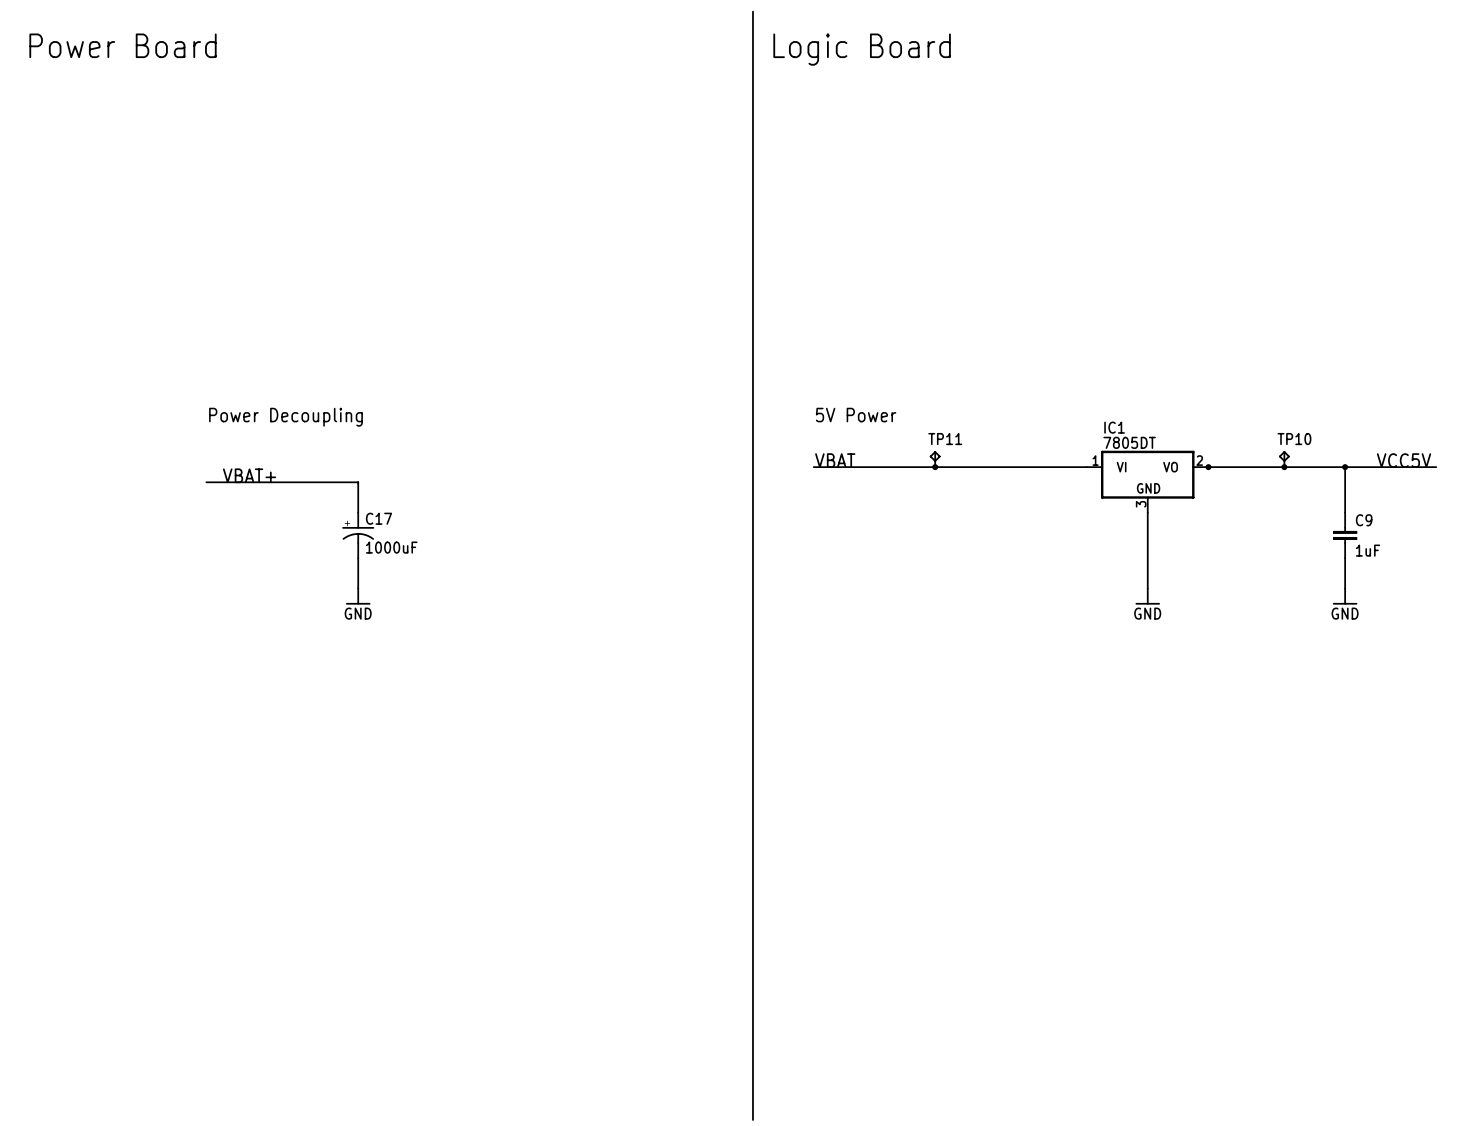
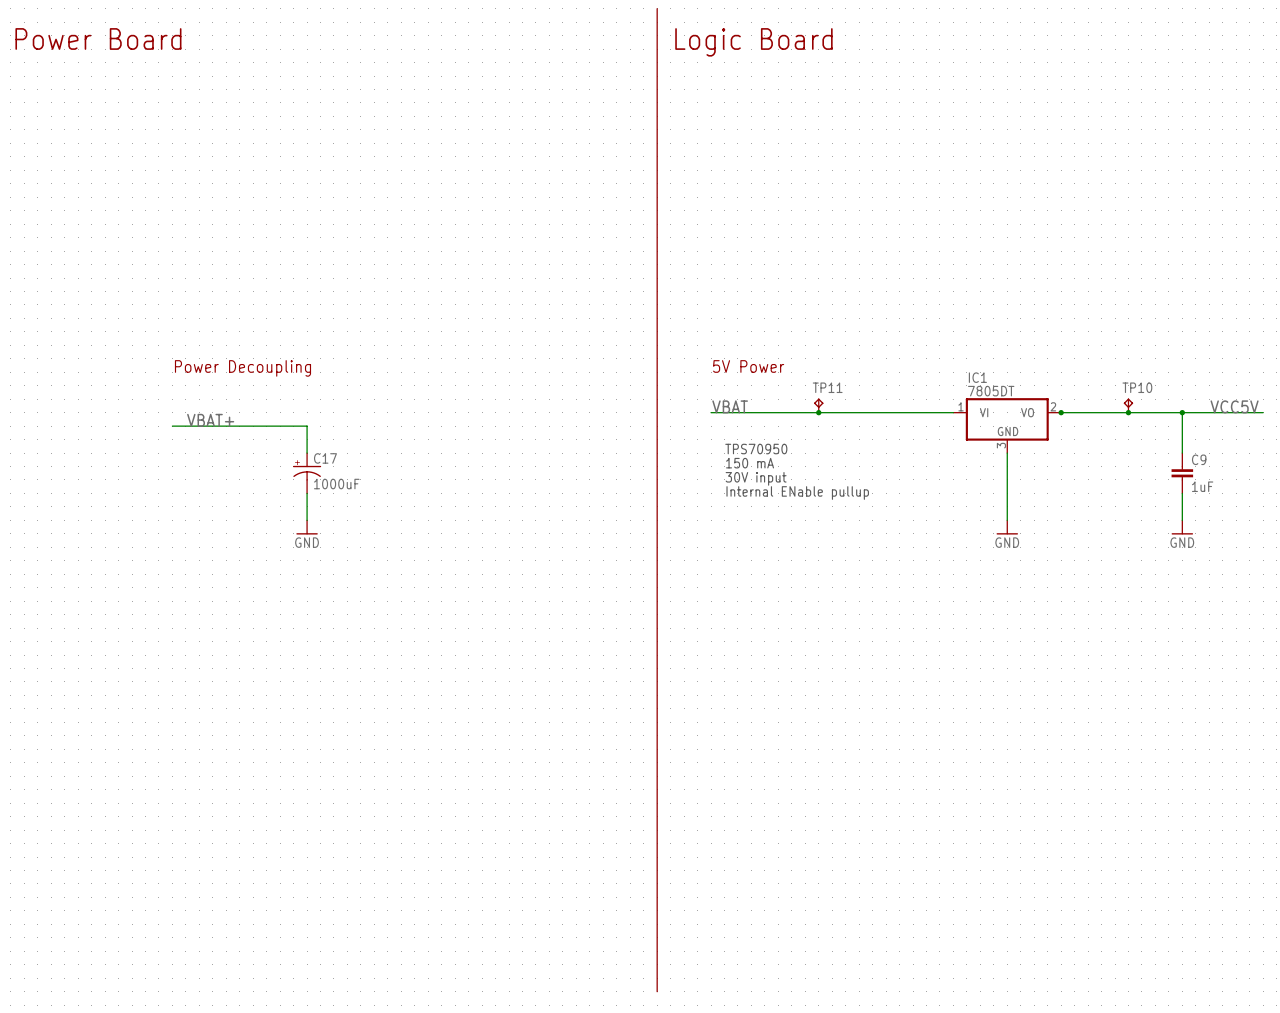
text: none -> TPS70950 (756, 449)
text: none -> 150 mA (750, 463)
text: none -> 30V input (756, 478)
text: none -> Internal ENable pullup (797, 493)

